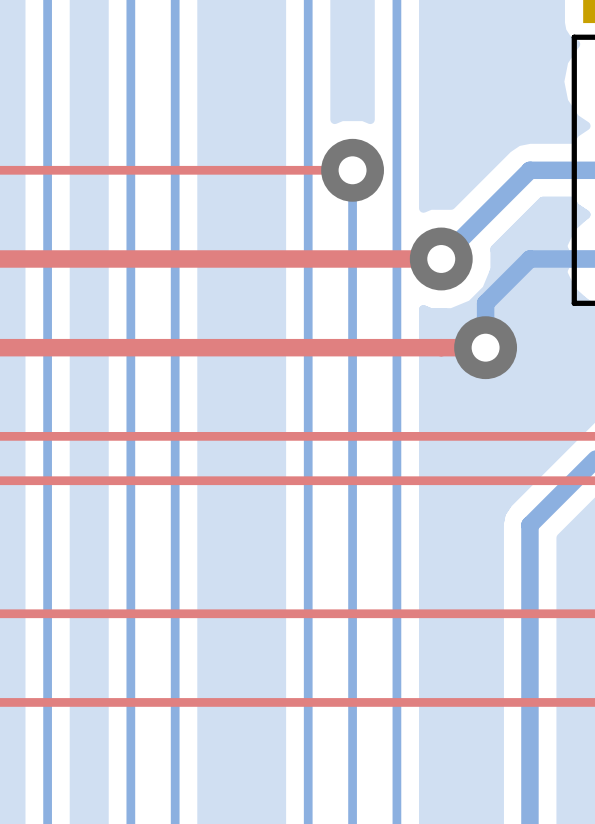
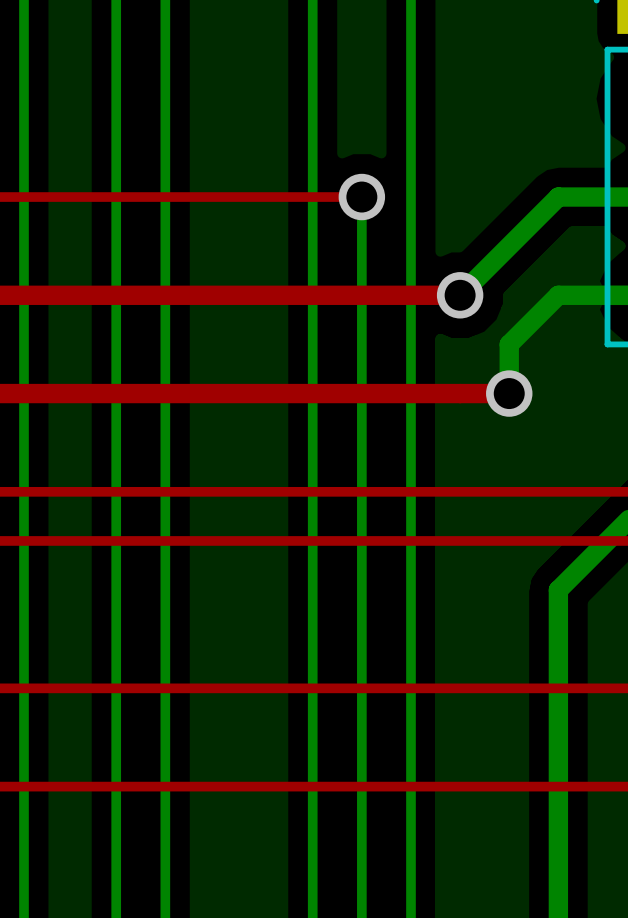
via size: [321, 138, 384, 202] -> [338, 173, 386, 221]
via size: [409, 227, 473, 291] -> [436, 272, 484, 319]
via size: [454, 316, 518, 380] -> [486, 370, 533, 417]

